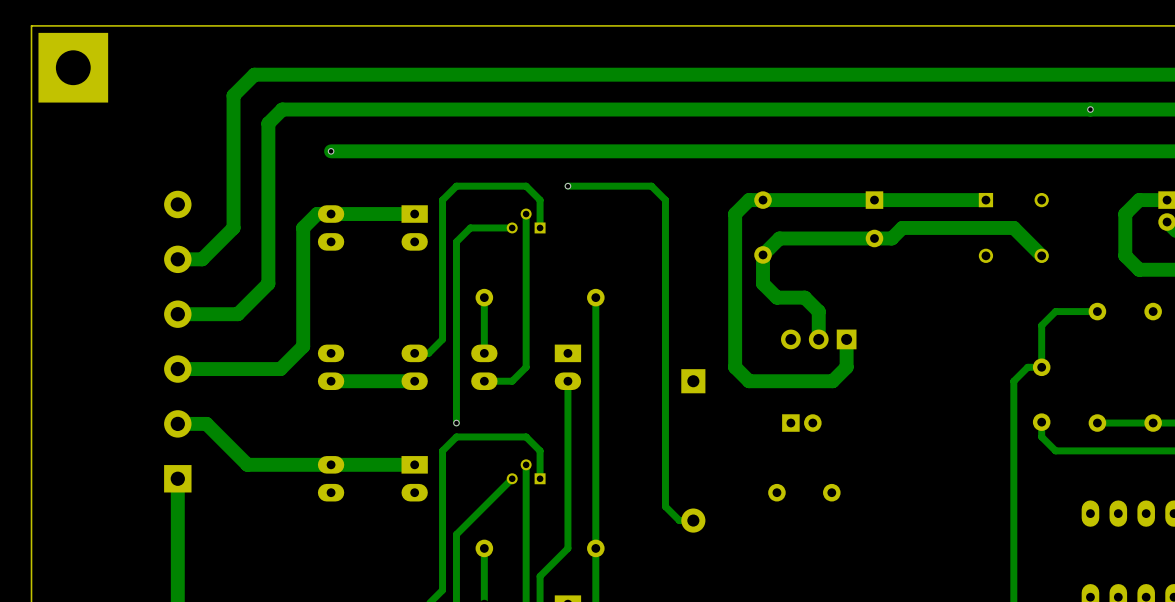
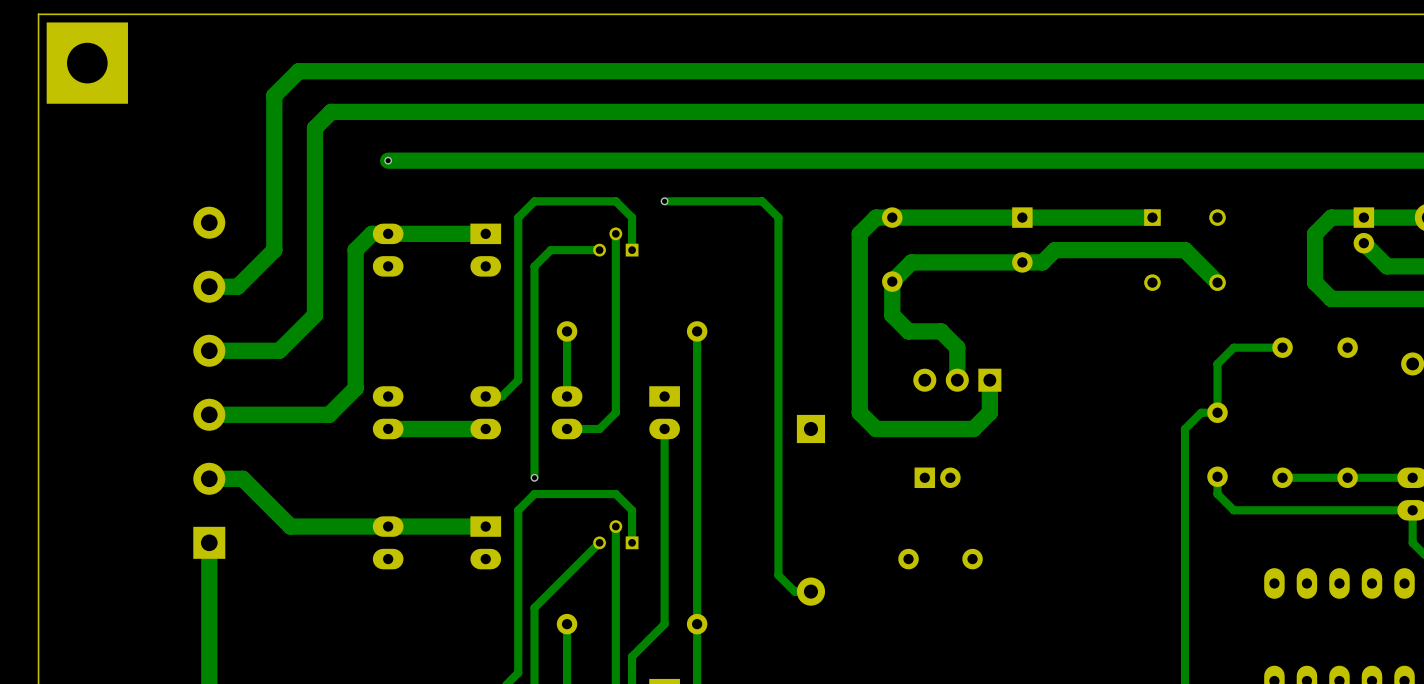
via: (1090, 109) -> none

